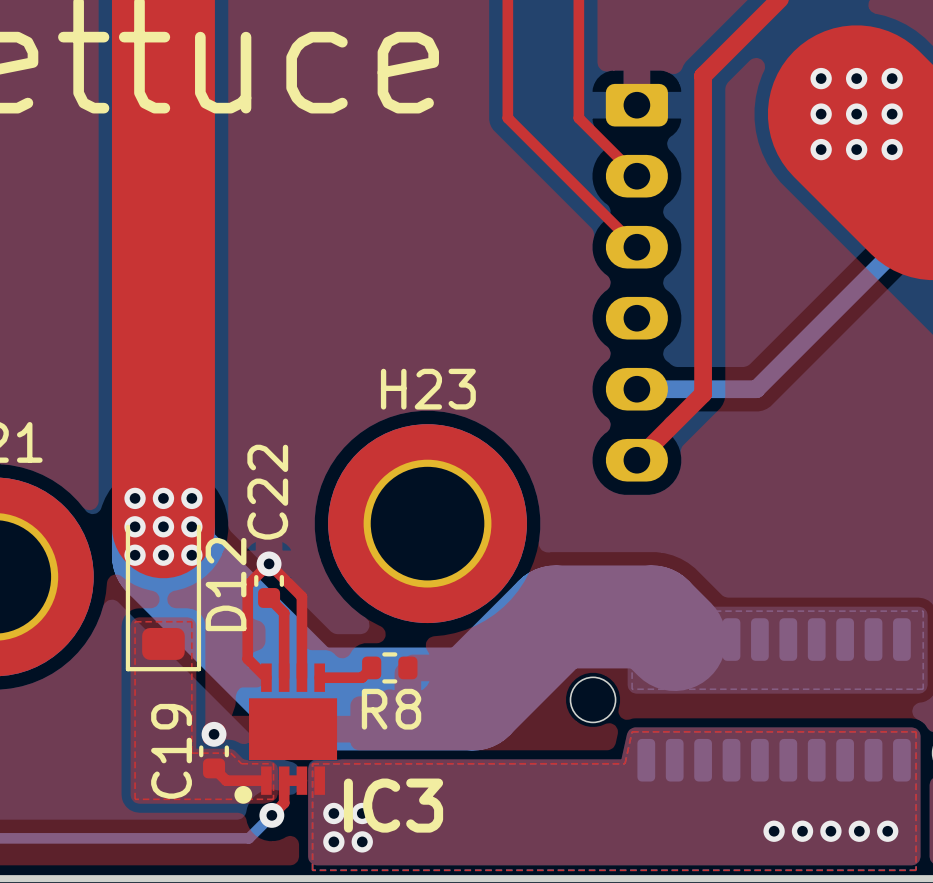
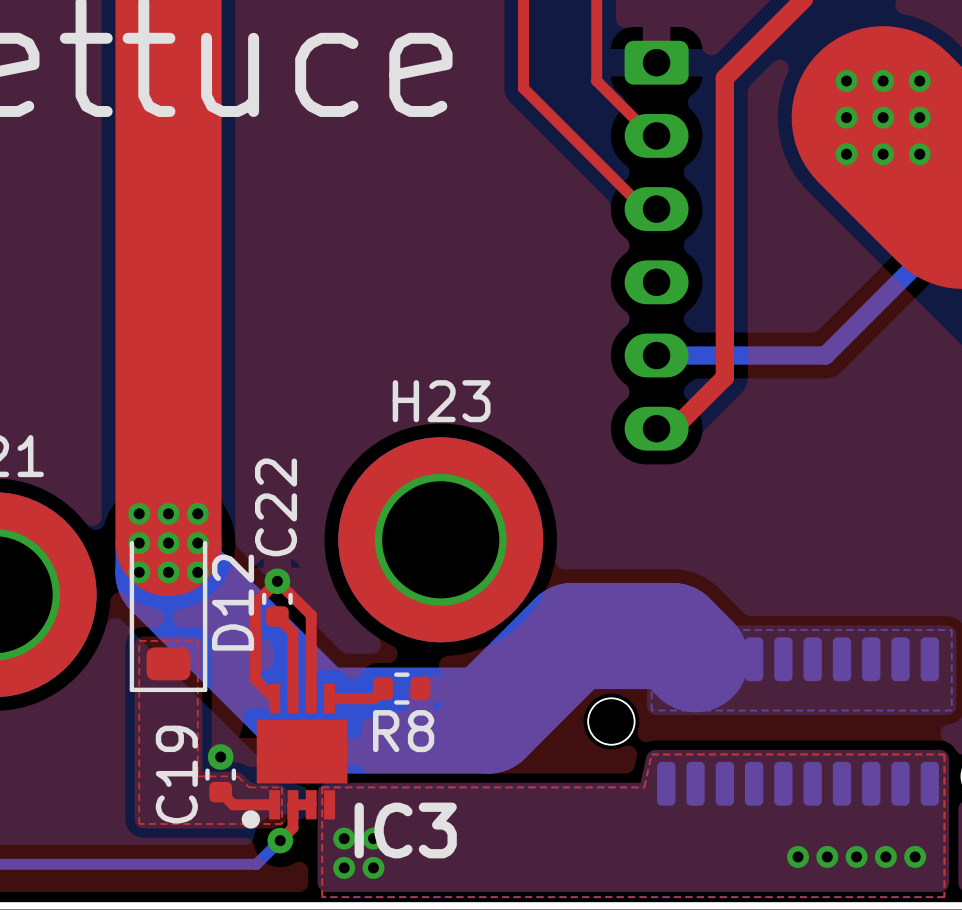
top track: (578, 78) (578, 118) (636, 176) -> (596, 81) (651, 135) (656, 135)
top track: (507, 85) (507, 118) (636, 247) -> (523, 88) (644, 209) (656, 209)
part position: (636, 282) -> (656, 245)
bottom track: (800, 344) (756, 389) (636, 389) -> (825, 355) (656, 355)
top track: (703, 366) (703, 394) (636, 460) -> (724, 377) (673, 428) (656, 428)

